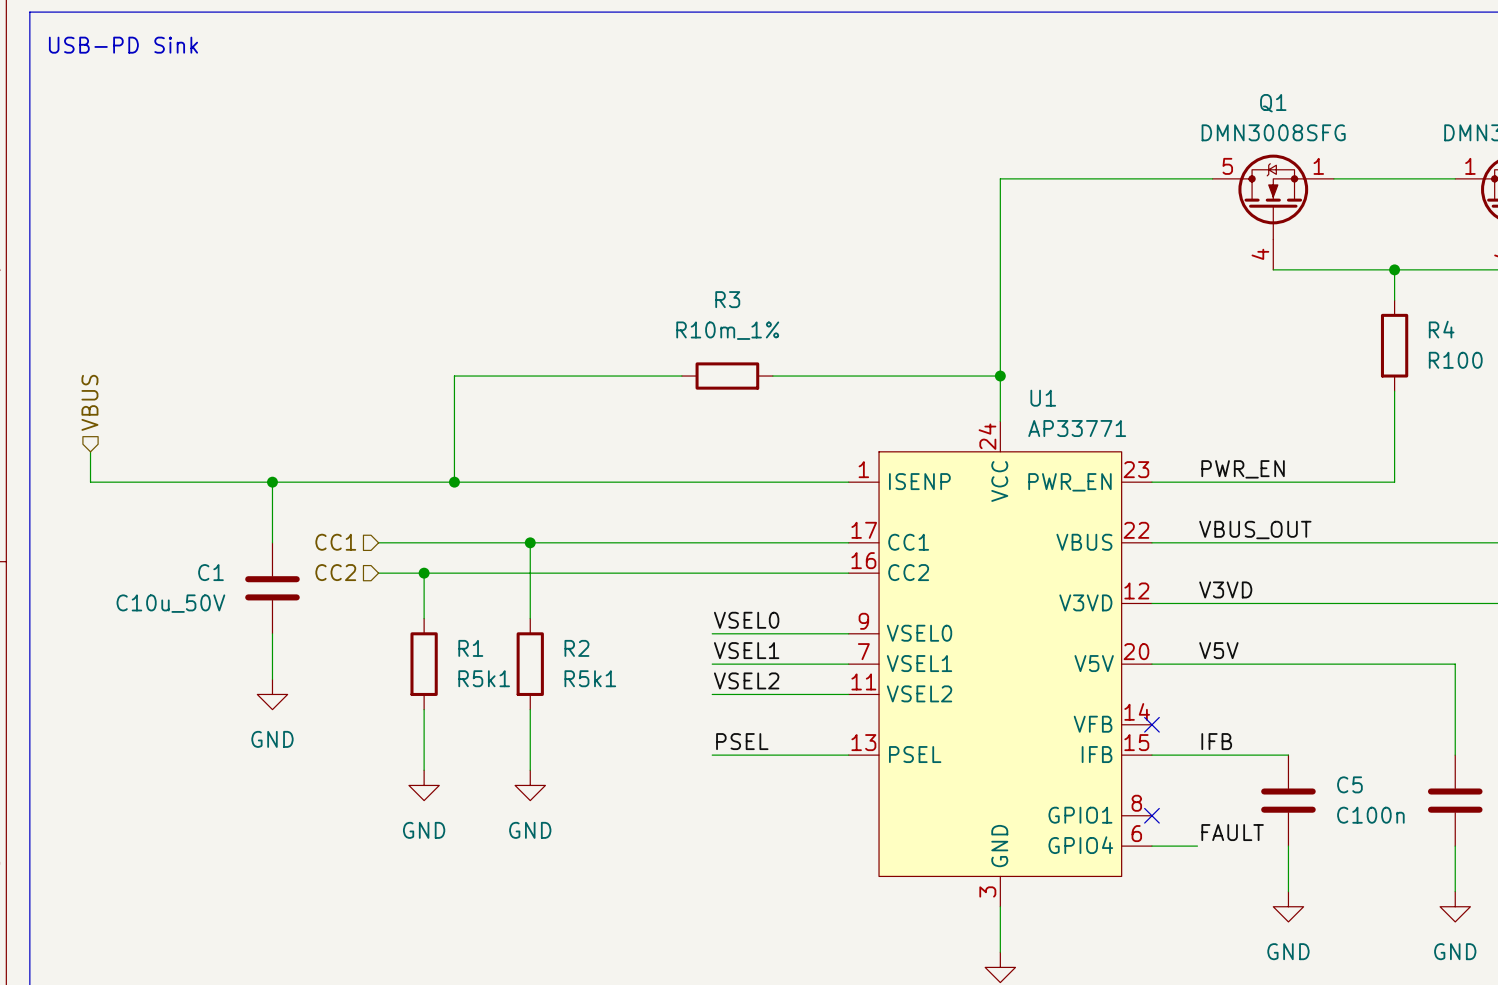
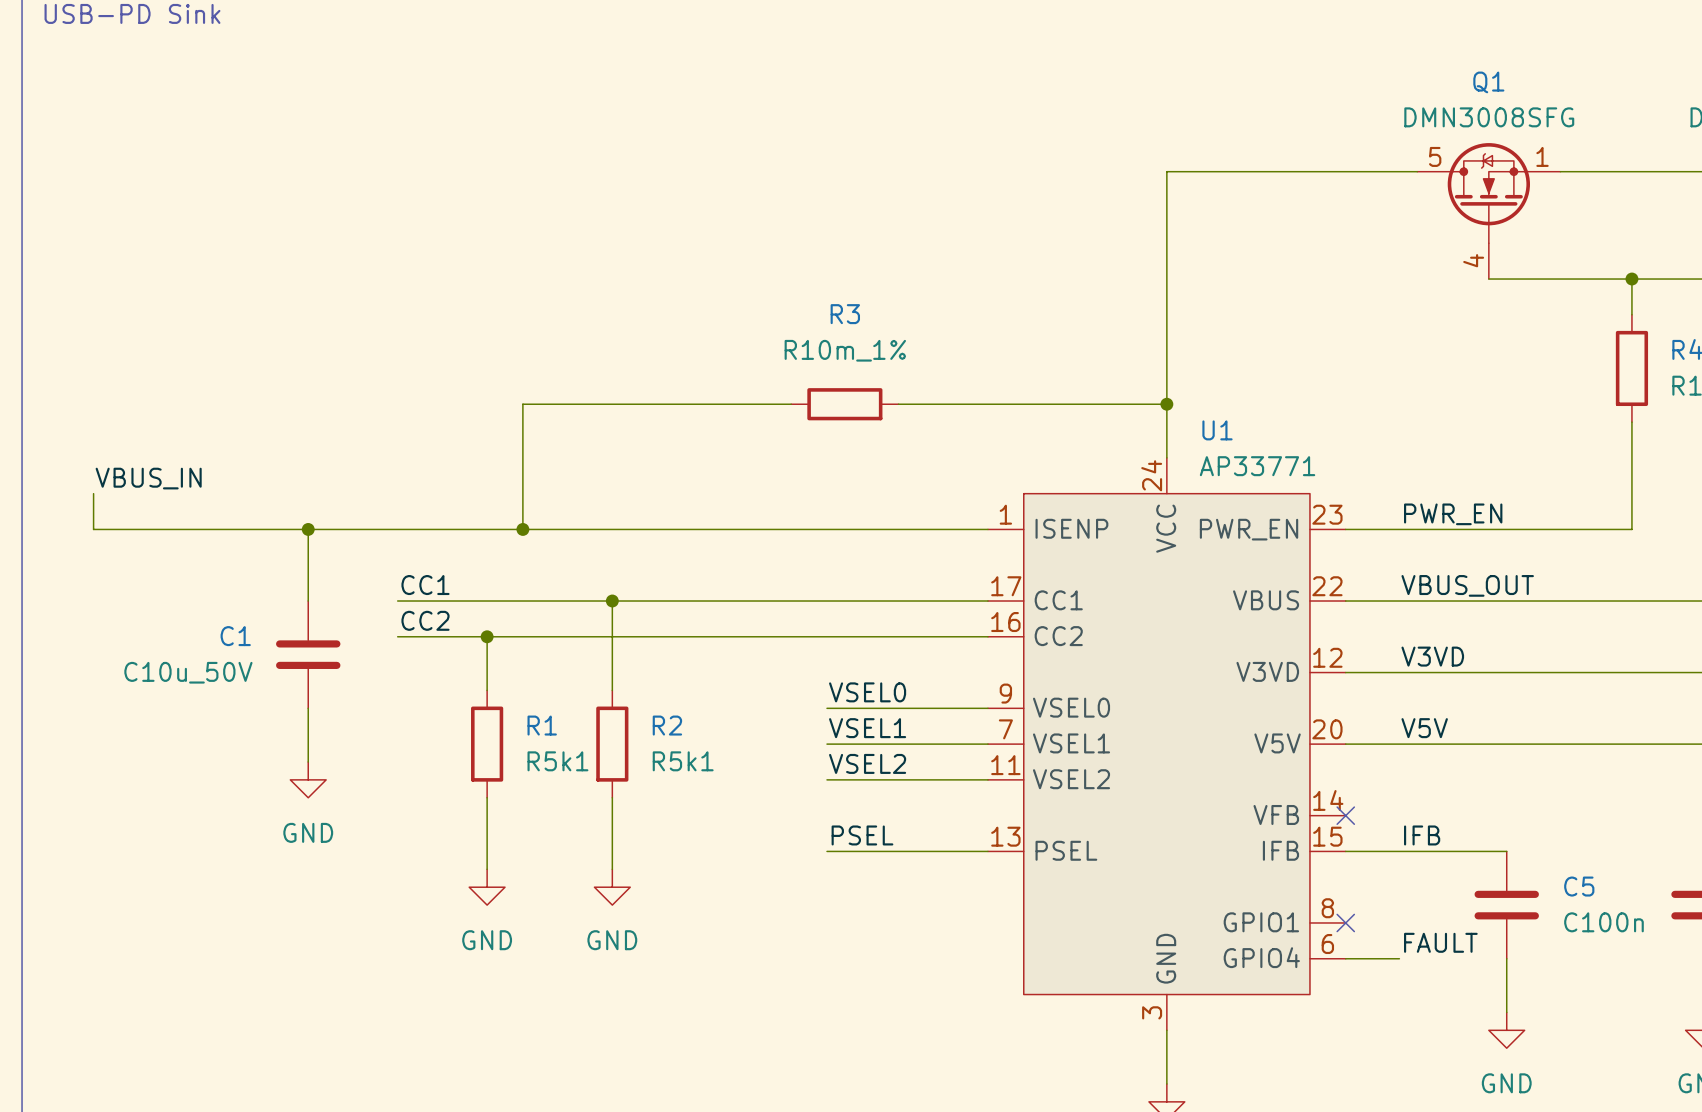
hierarchical label: VBUS (89, 402) -> none
label: none -> VBUS_IN (148, 478)
label: none -> CC1 (425, 585)
hierarchical label: CC1 (335, 542) -> none
wire: none -> (397, 601) (433, 601)
label: none -> CC2 (425, 620)
hierarchical label: CC2 (335, 572) -> none
wire: none -> (397, 636) (433, 636)

